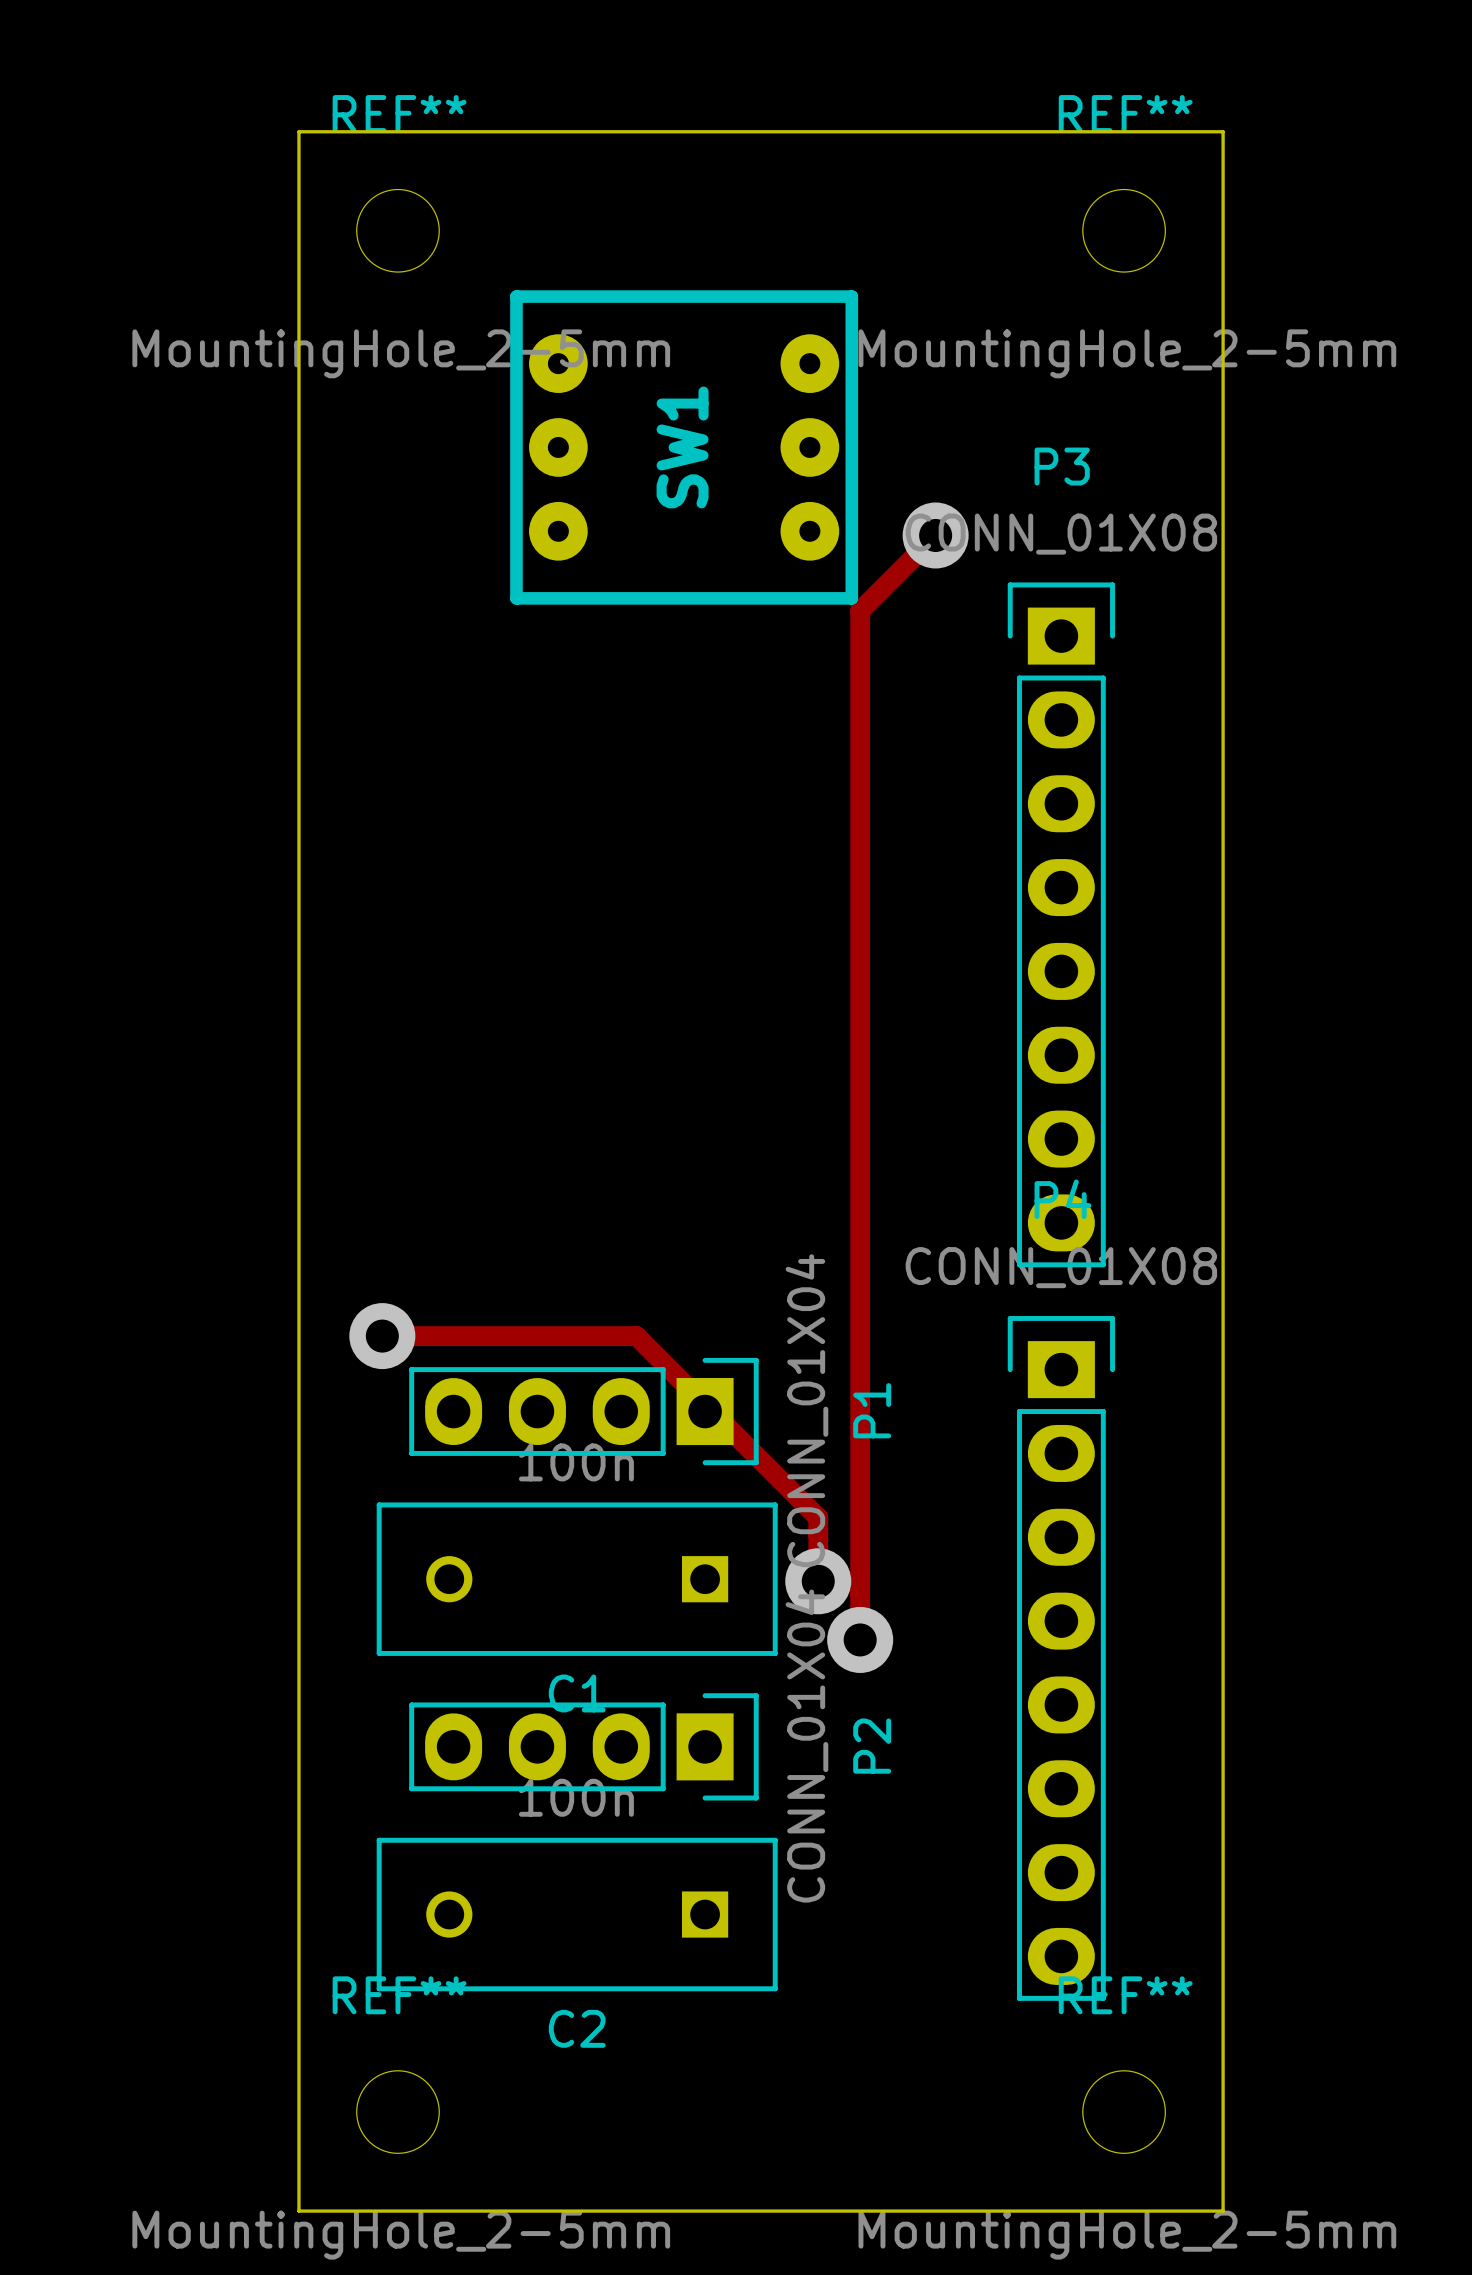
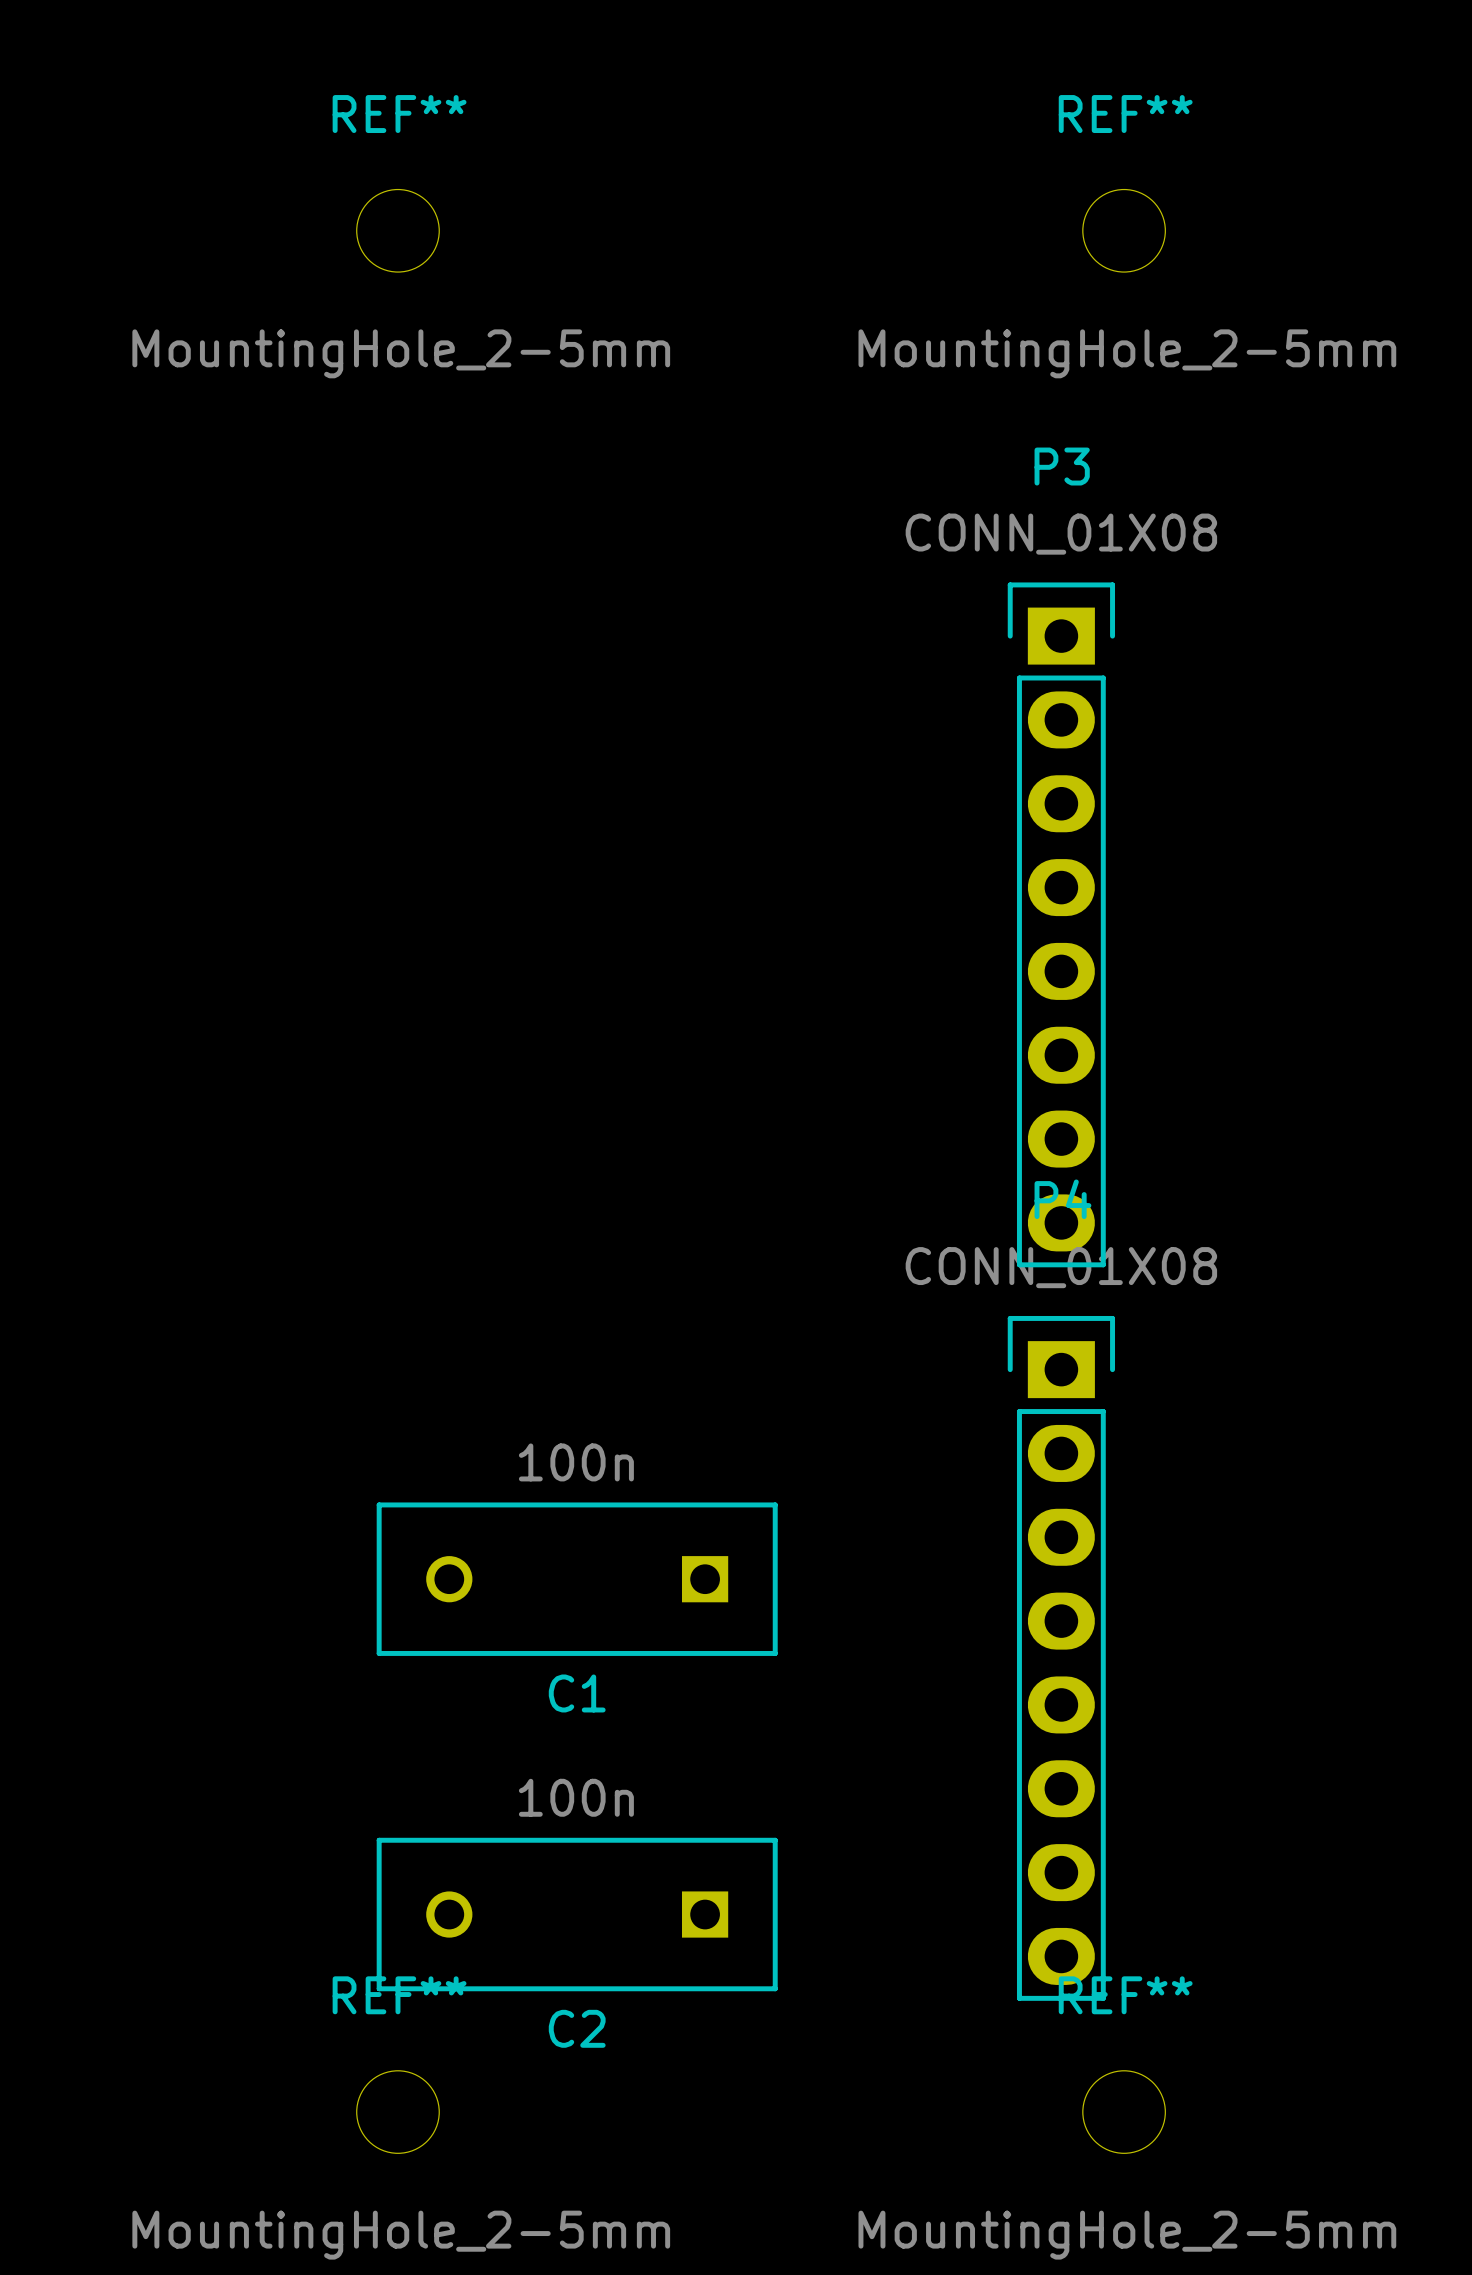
board edge: (298, 131) (1223, 131) (1223, 2211) (298, 2211) (298, 131) -> none
SW1: (684, 447) -> none
track: (935, 535) (860, 610) (860, 1639) -> none
via: (935, 535) -> none
track: (382, 1336) (636, 1336) (818, 1517) (818, 1581) -> none
via: (382, 1336) -> none
P1: CONN_01X04 (583, 1411) -> none
via: (818, 1581) -> none
via: (860, 1639) -> none
P2: CONN_01X04 (583, 1746) -> none

